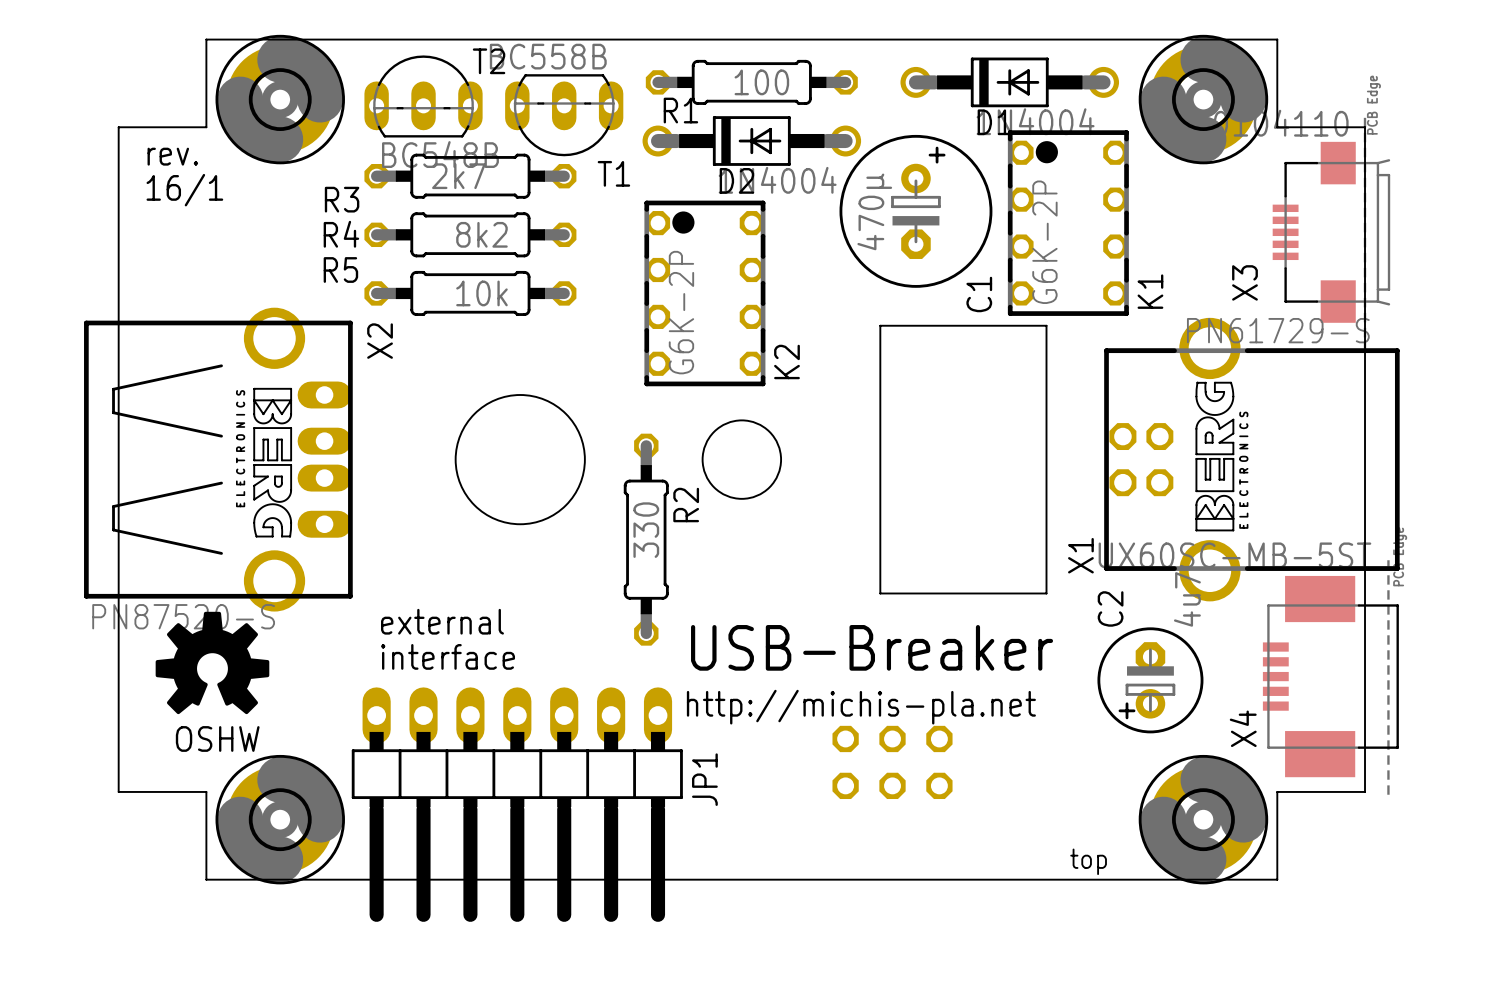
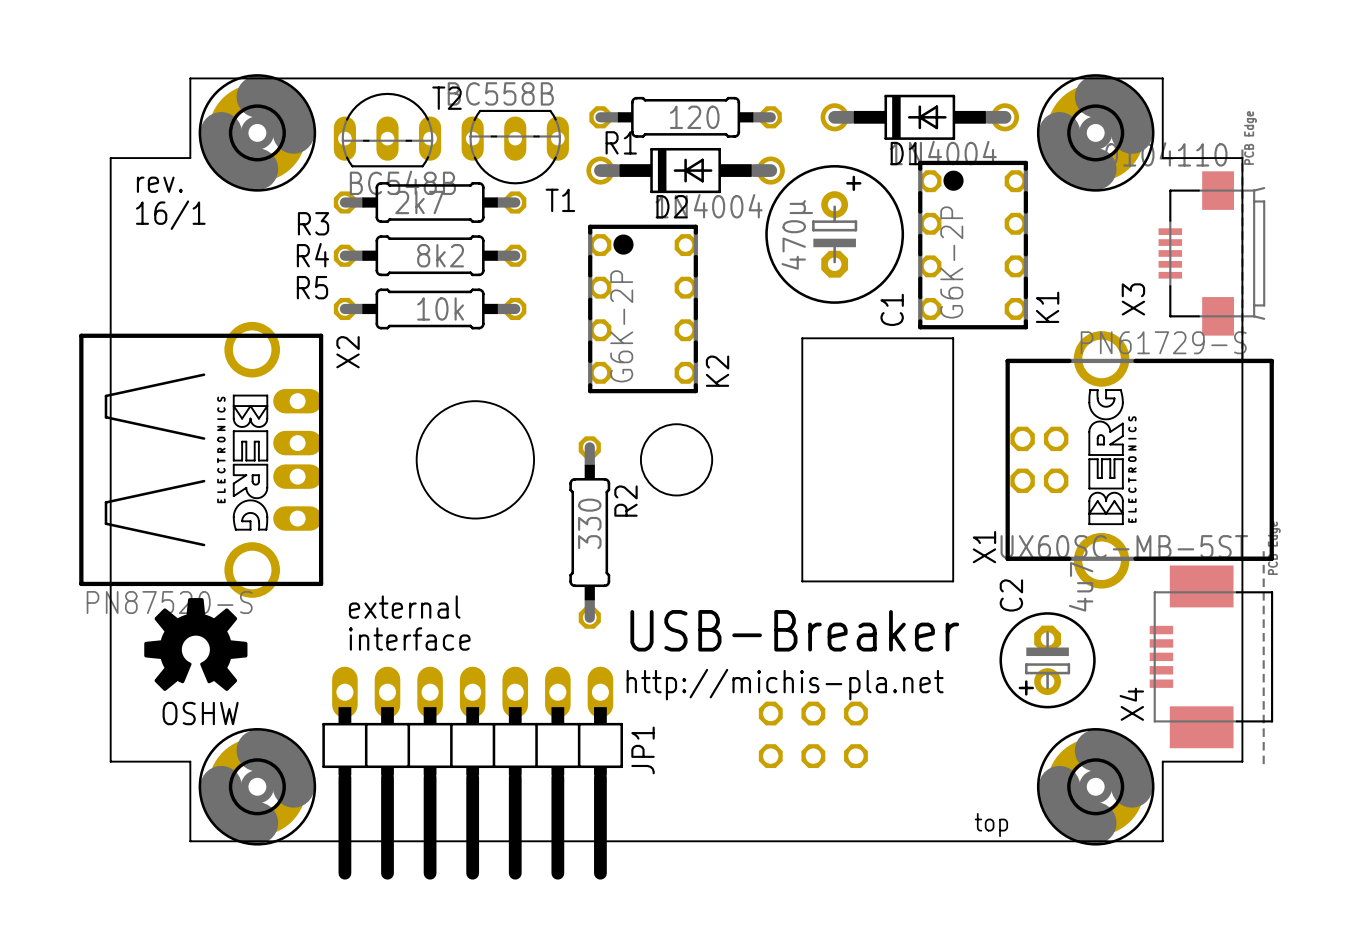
R1 value: 100 (761, 82) -> 120 (694, 117)

